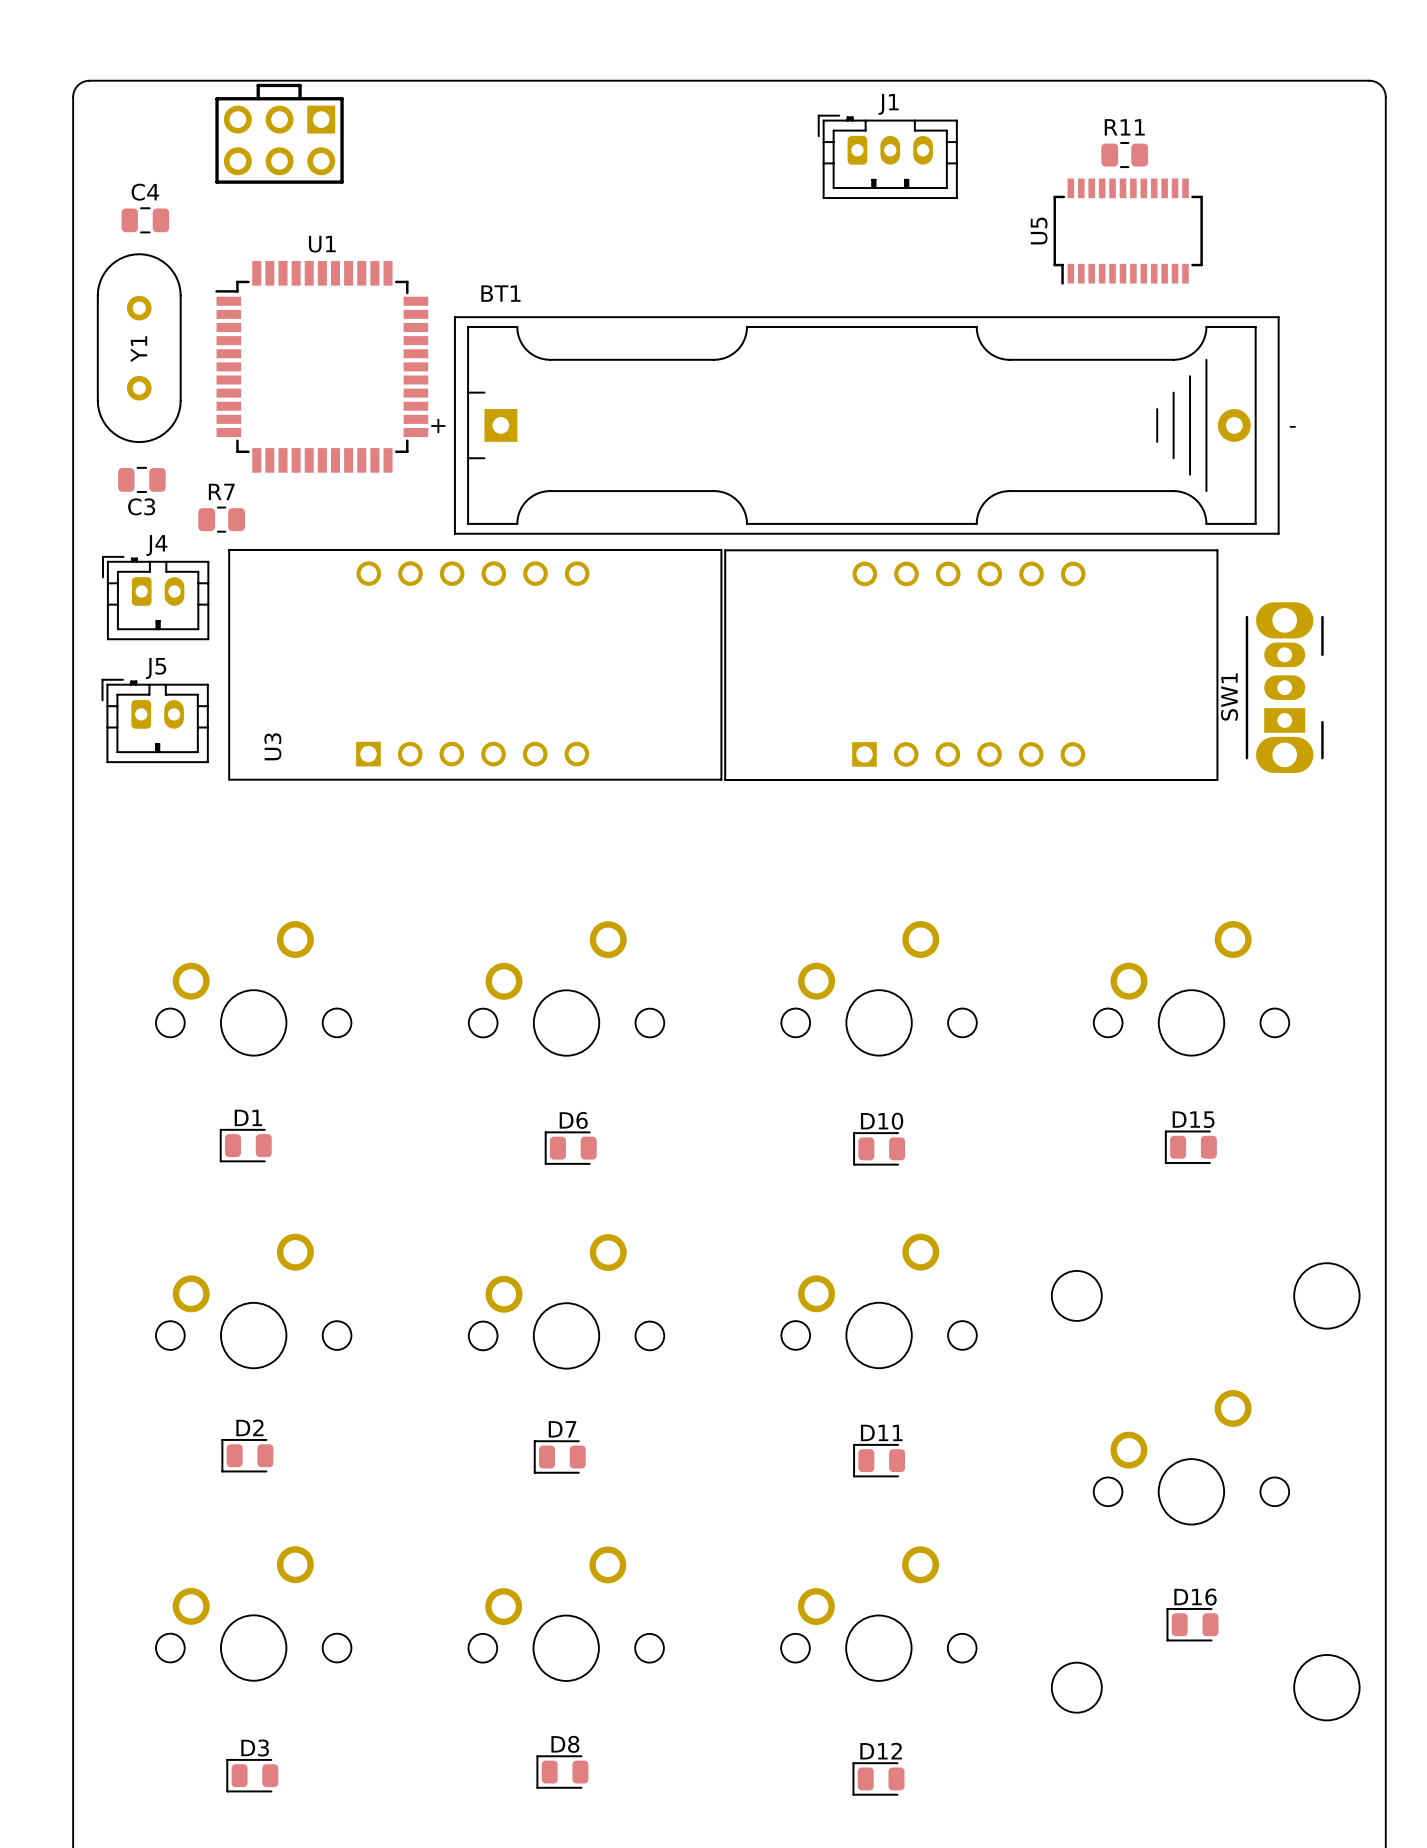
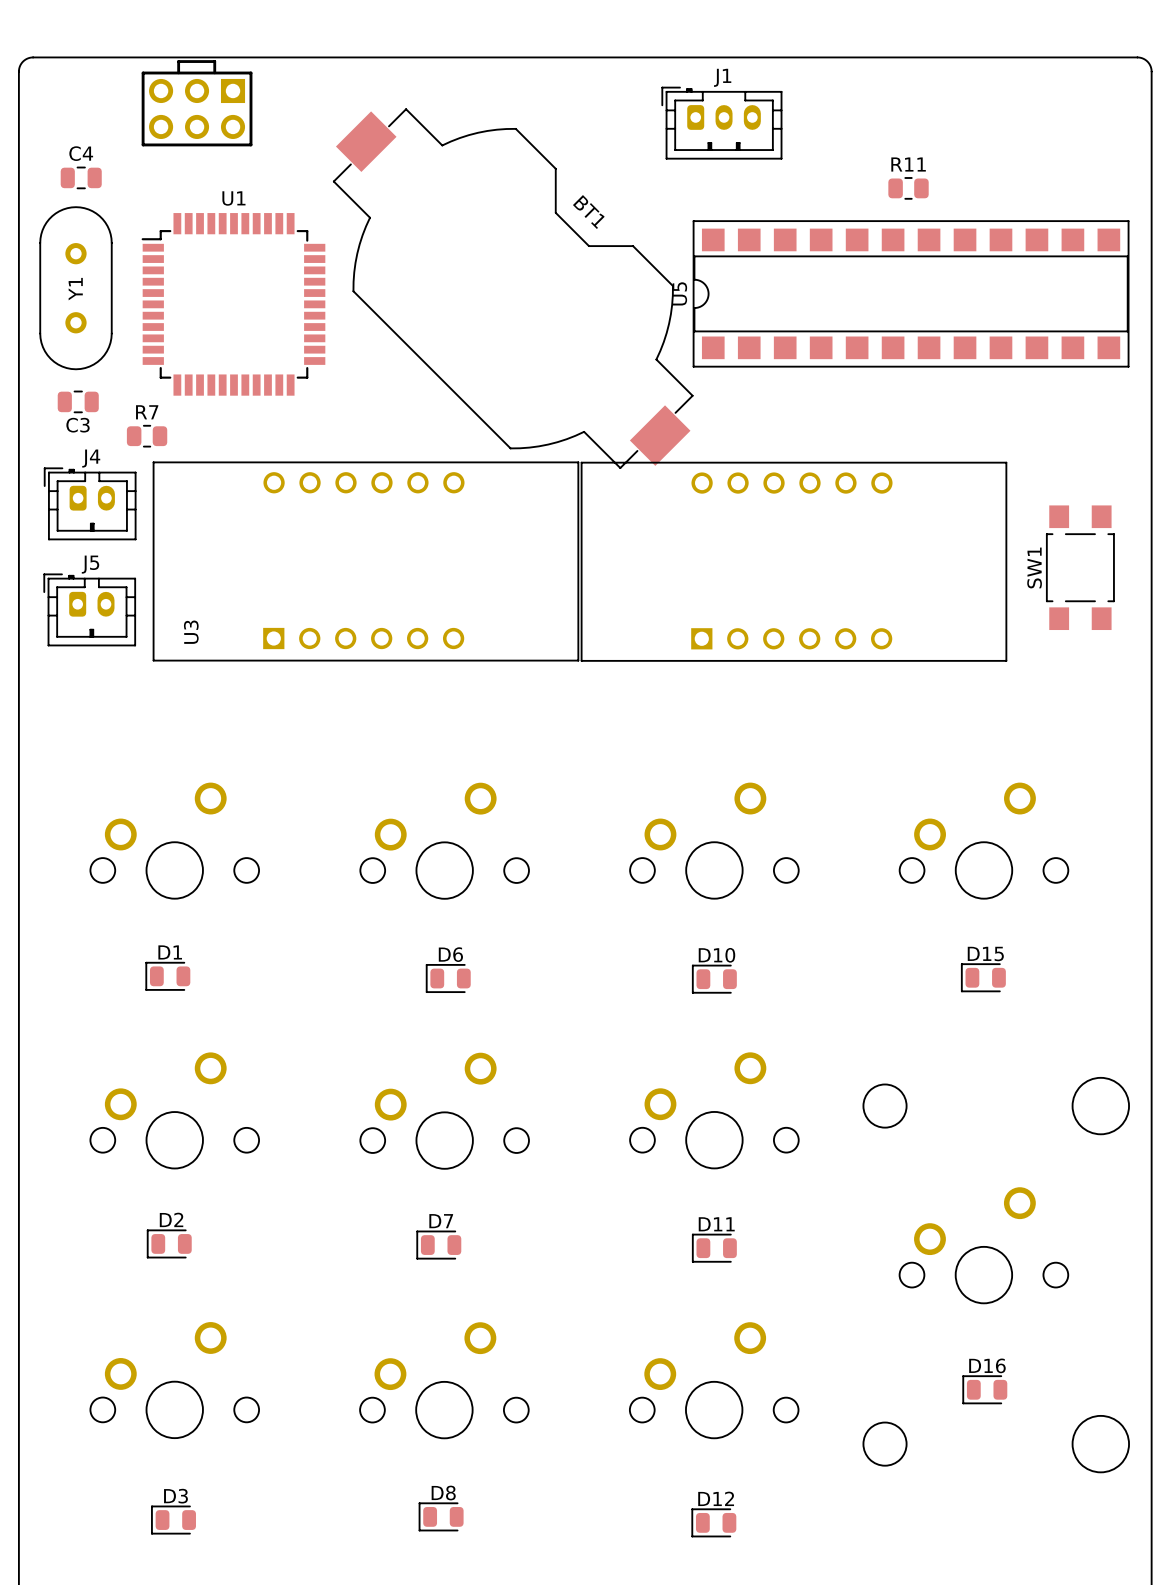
R11 position: (1124, 155) -> (908, 188)
U5 footprint: [1053, 178, 1203, 285] -> [692, 220, 1130, 368]
U5 name position: U5 (1039, 231) -> U5 (679, 293)
BT1 name position: BT1 (500, 293) -> BT1 (588, 212)
BT1 footprint: [453, 316, 1280, 535] -> [332, 108, 694, 469]
SW1 footprint: [1245, 602, 1324, 773] -> [1046, 505, 1115, 631]

